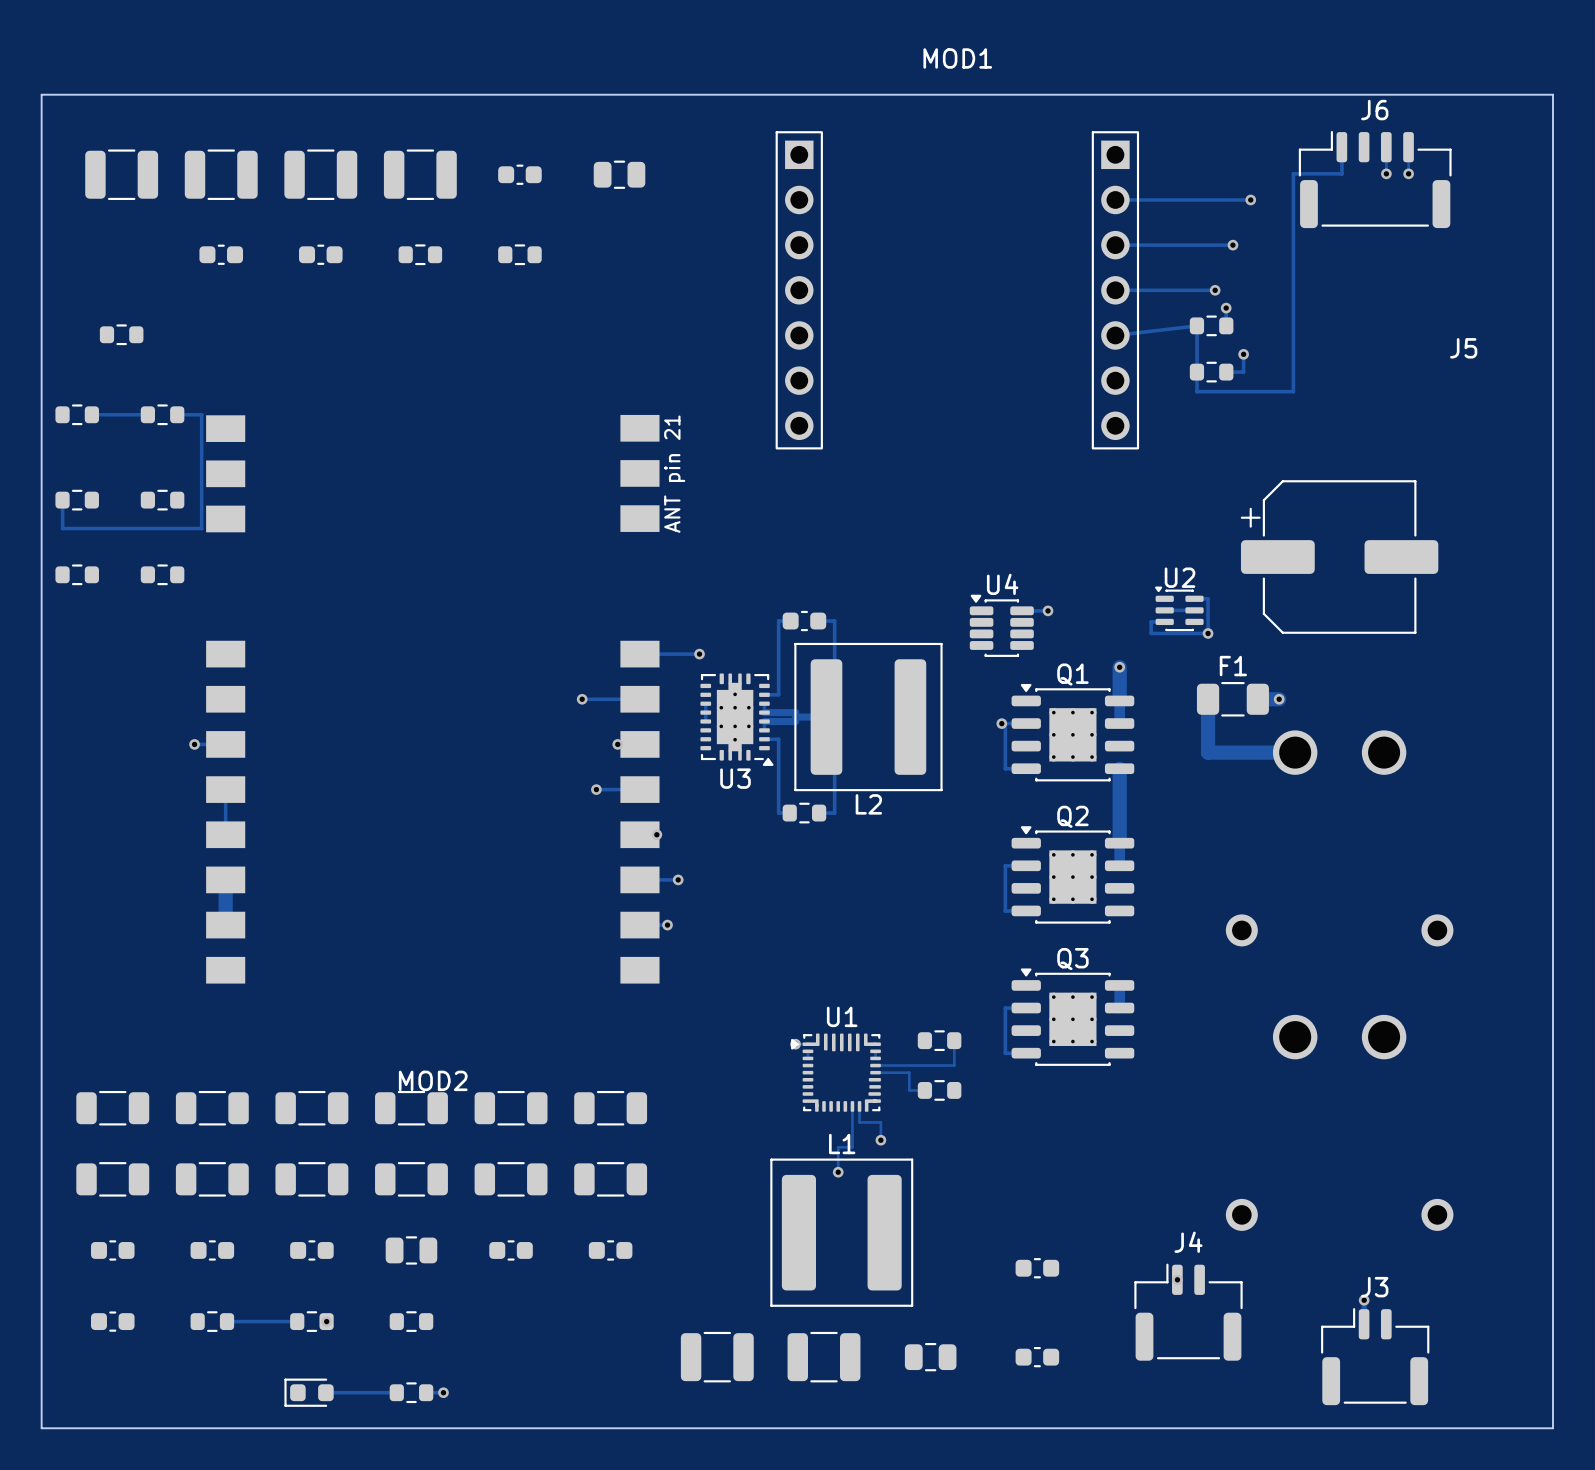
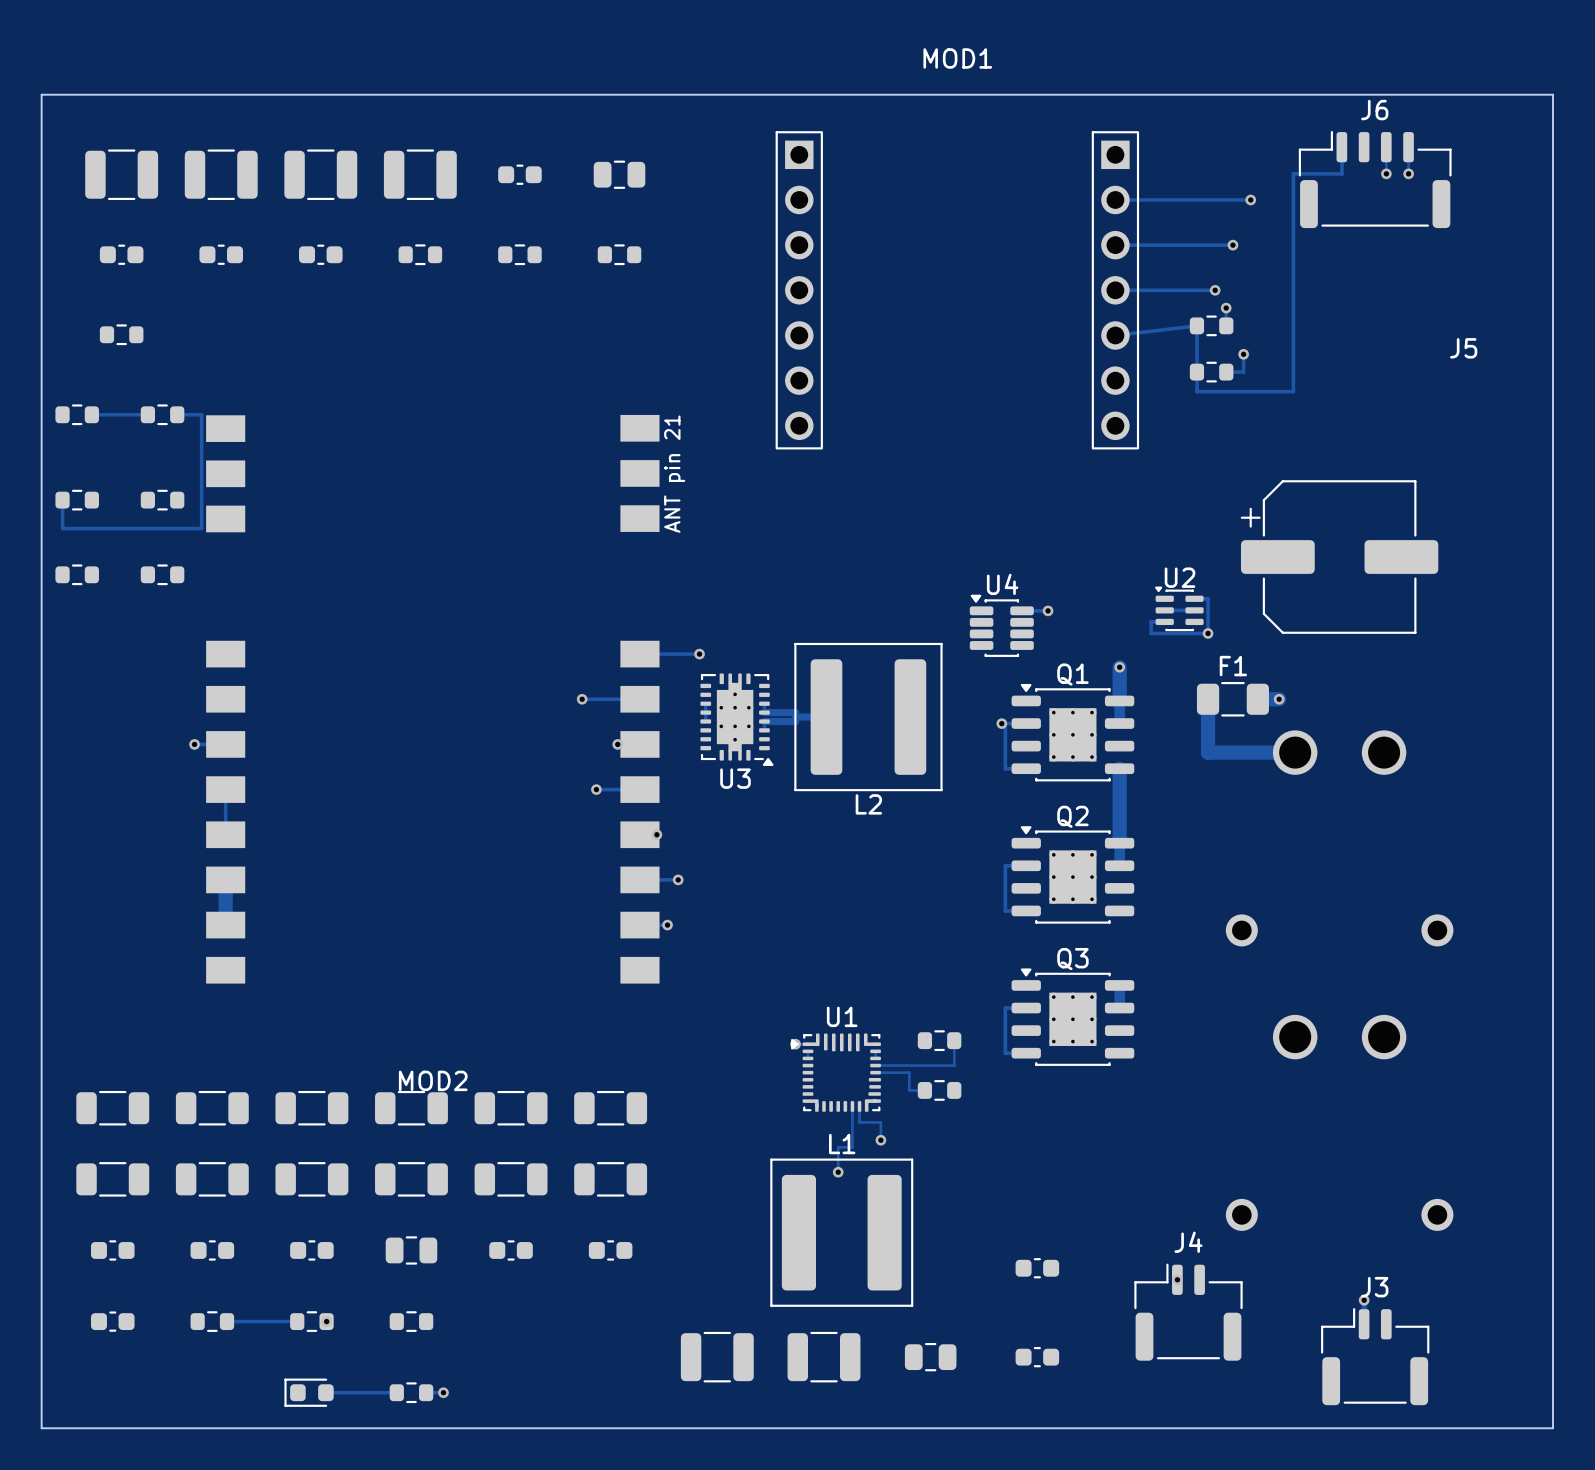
part: none -> (121, 254)
part: none -> (619, 254)
track: (790, 621) (778, 621) (778, 694) (764, 694) -> none
part: (804, 621) -> none
track: (818, 621) (834, 621) (834, 813) (819, 813) -> none
track: (764, 739) (778, 739) (778, 813) (789, 813) -> none
part: (804, 813) -> none

